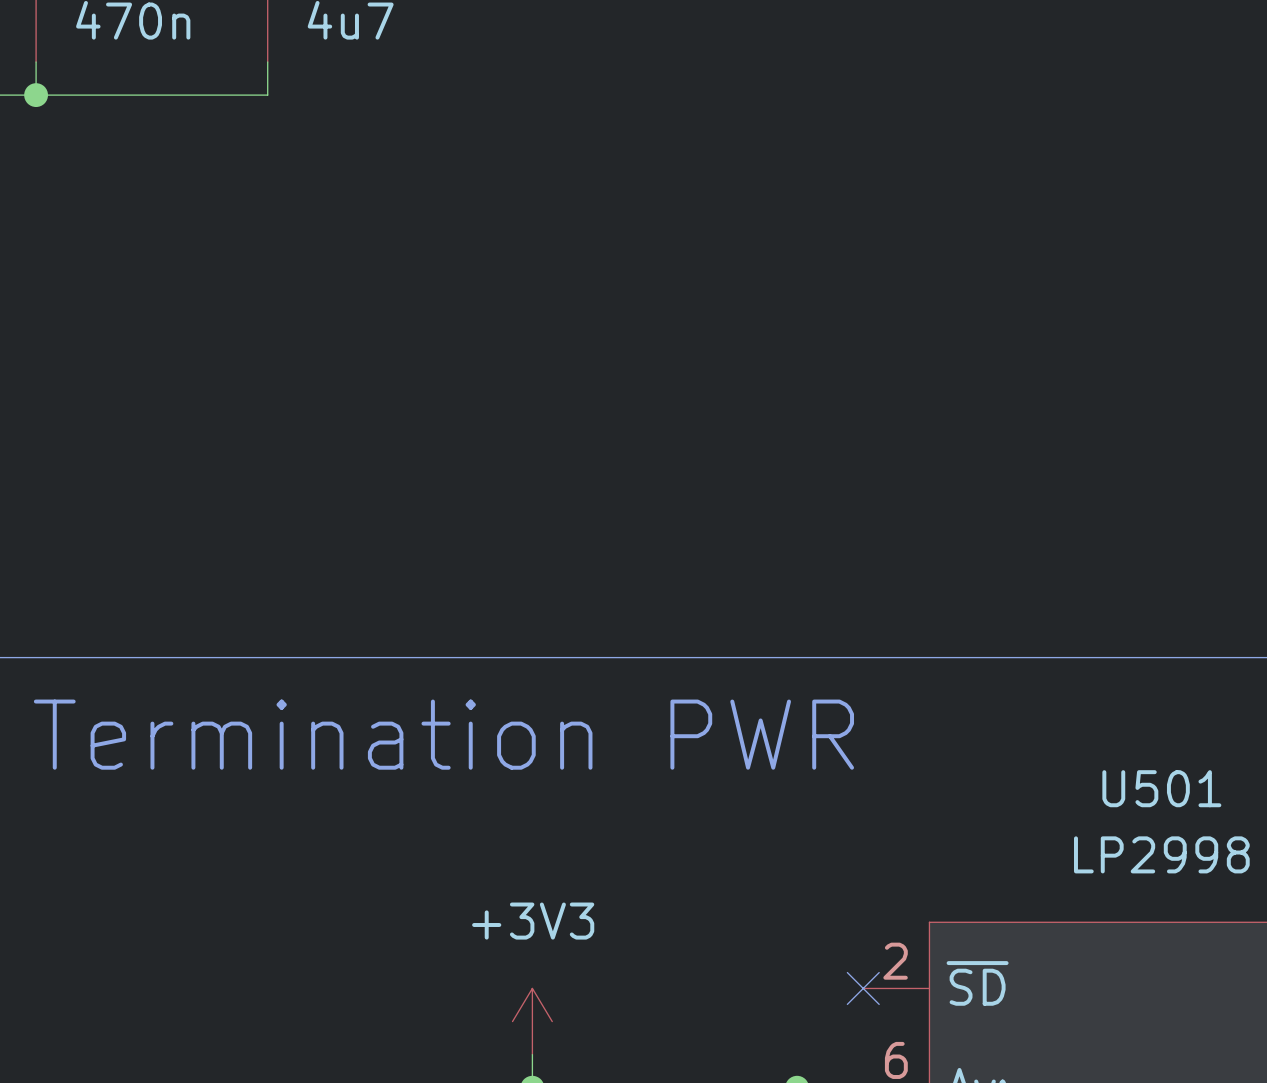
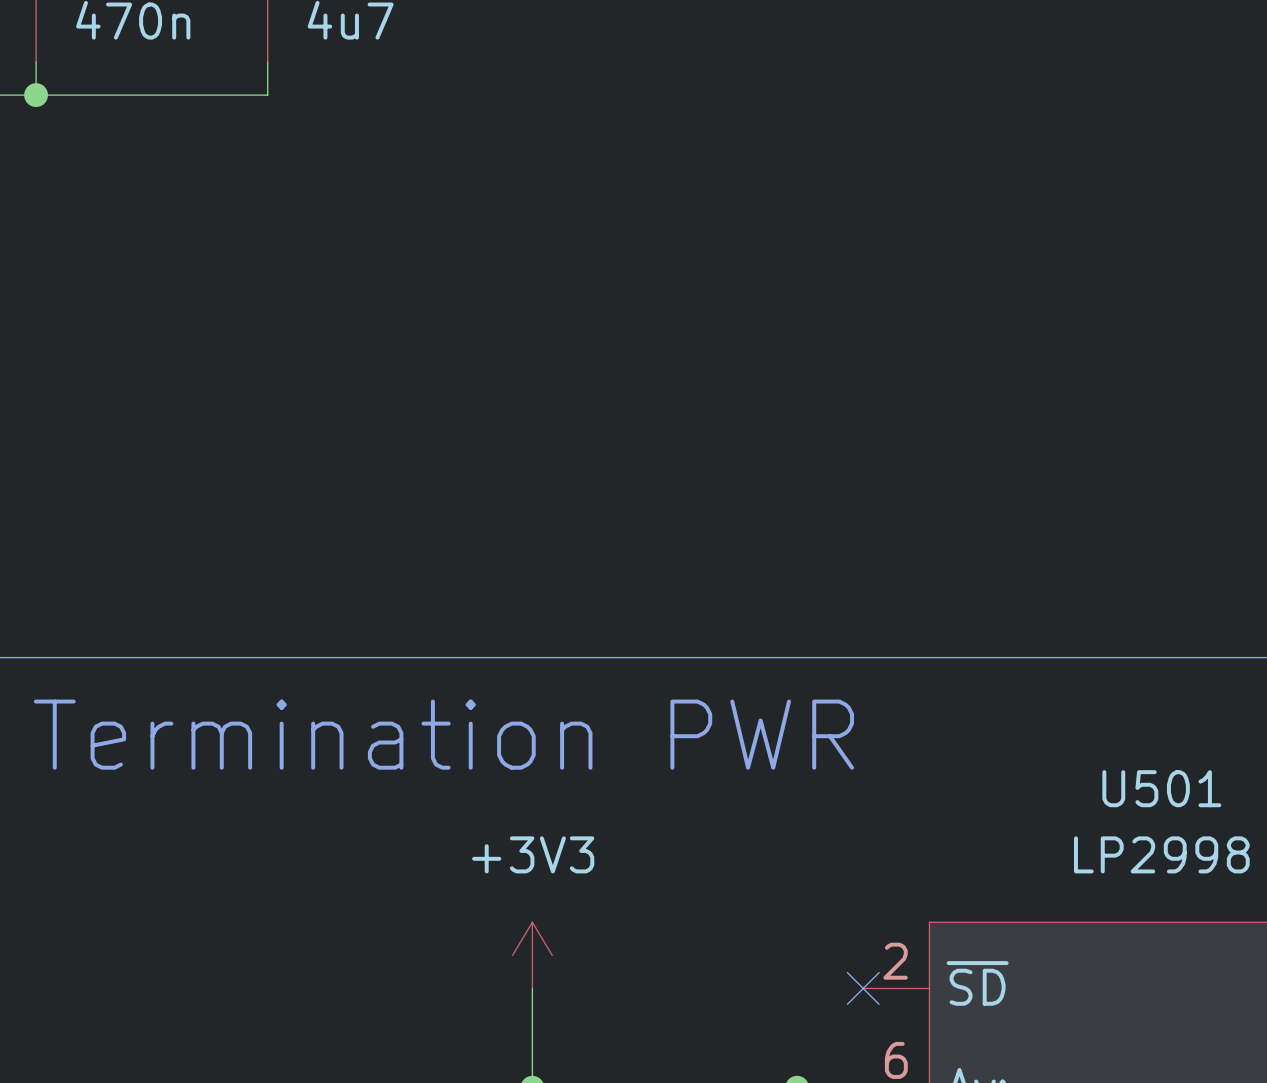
power symbol position: +3V3 (532, 1021) -> +3V3 (532, 955)

